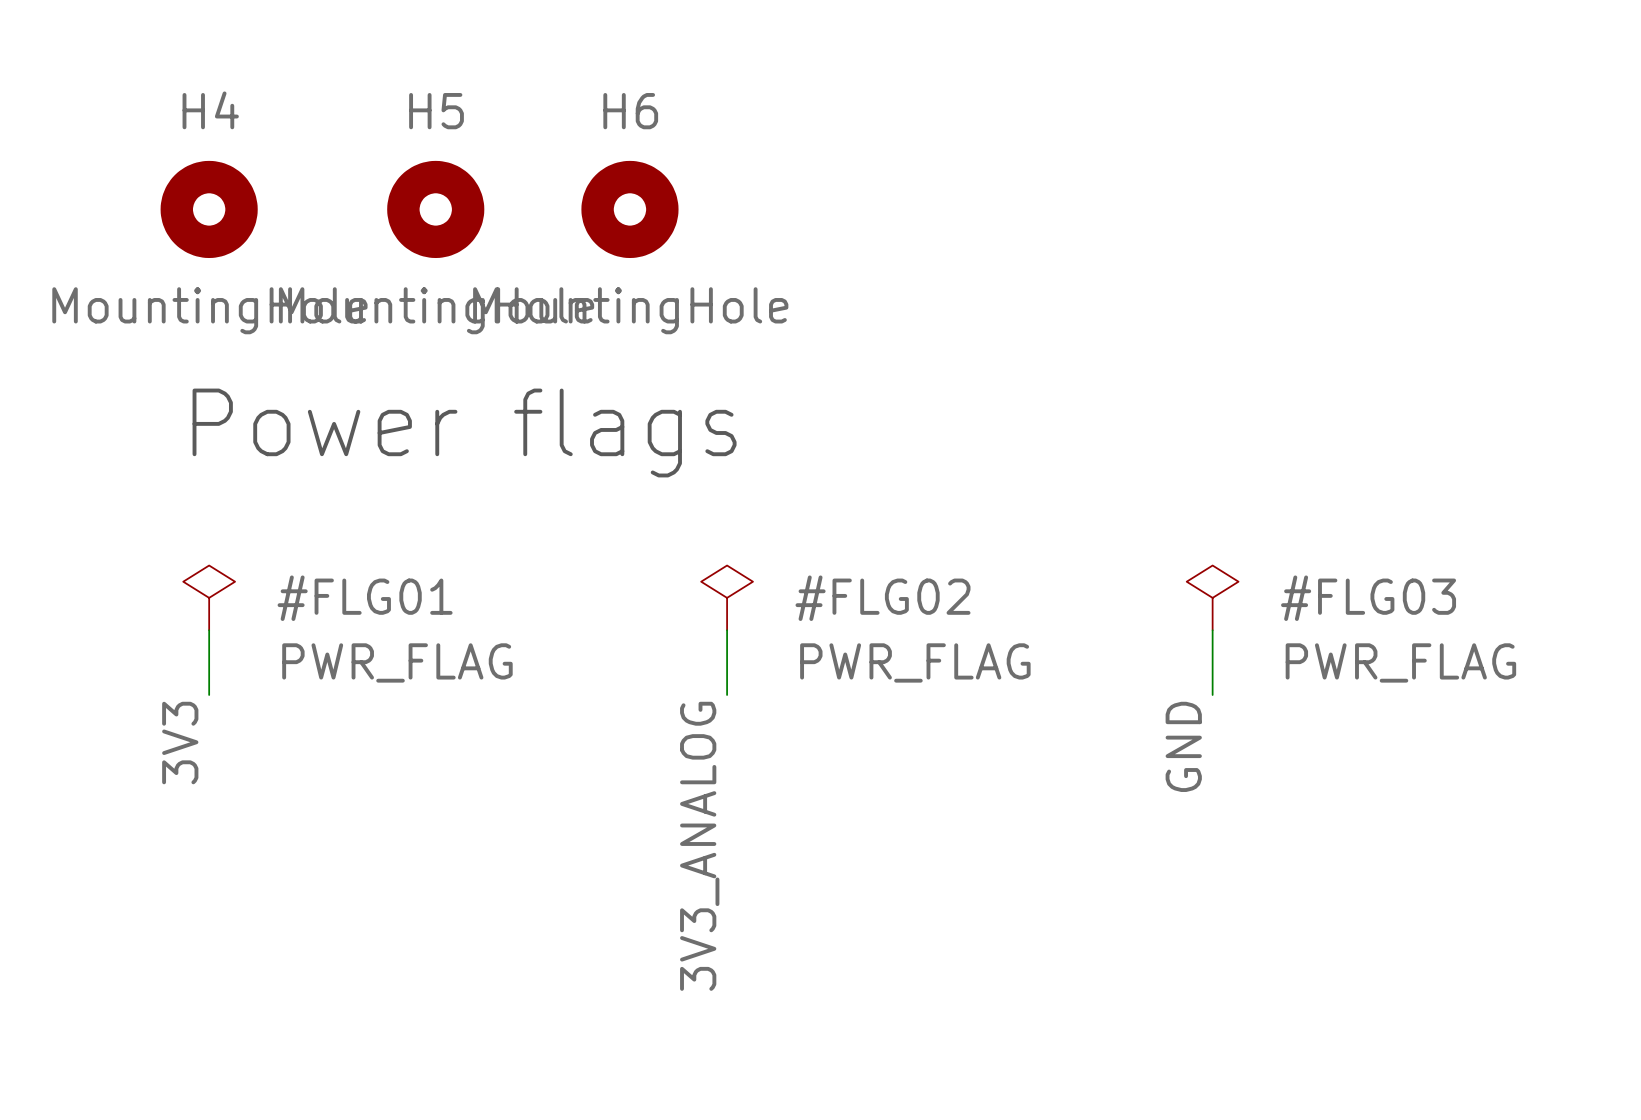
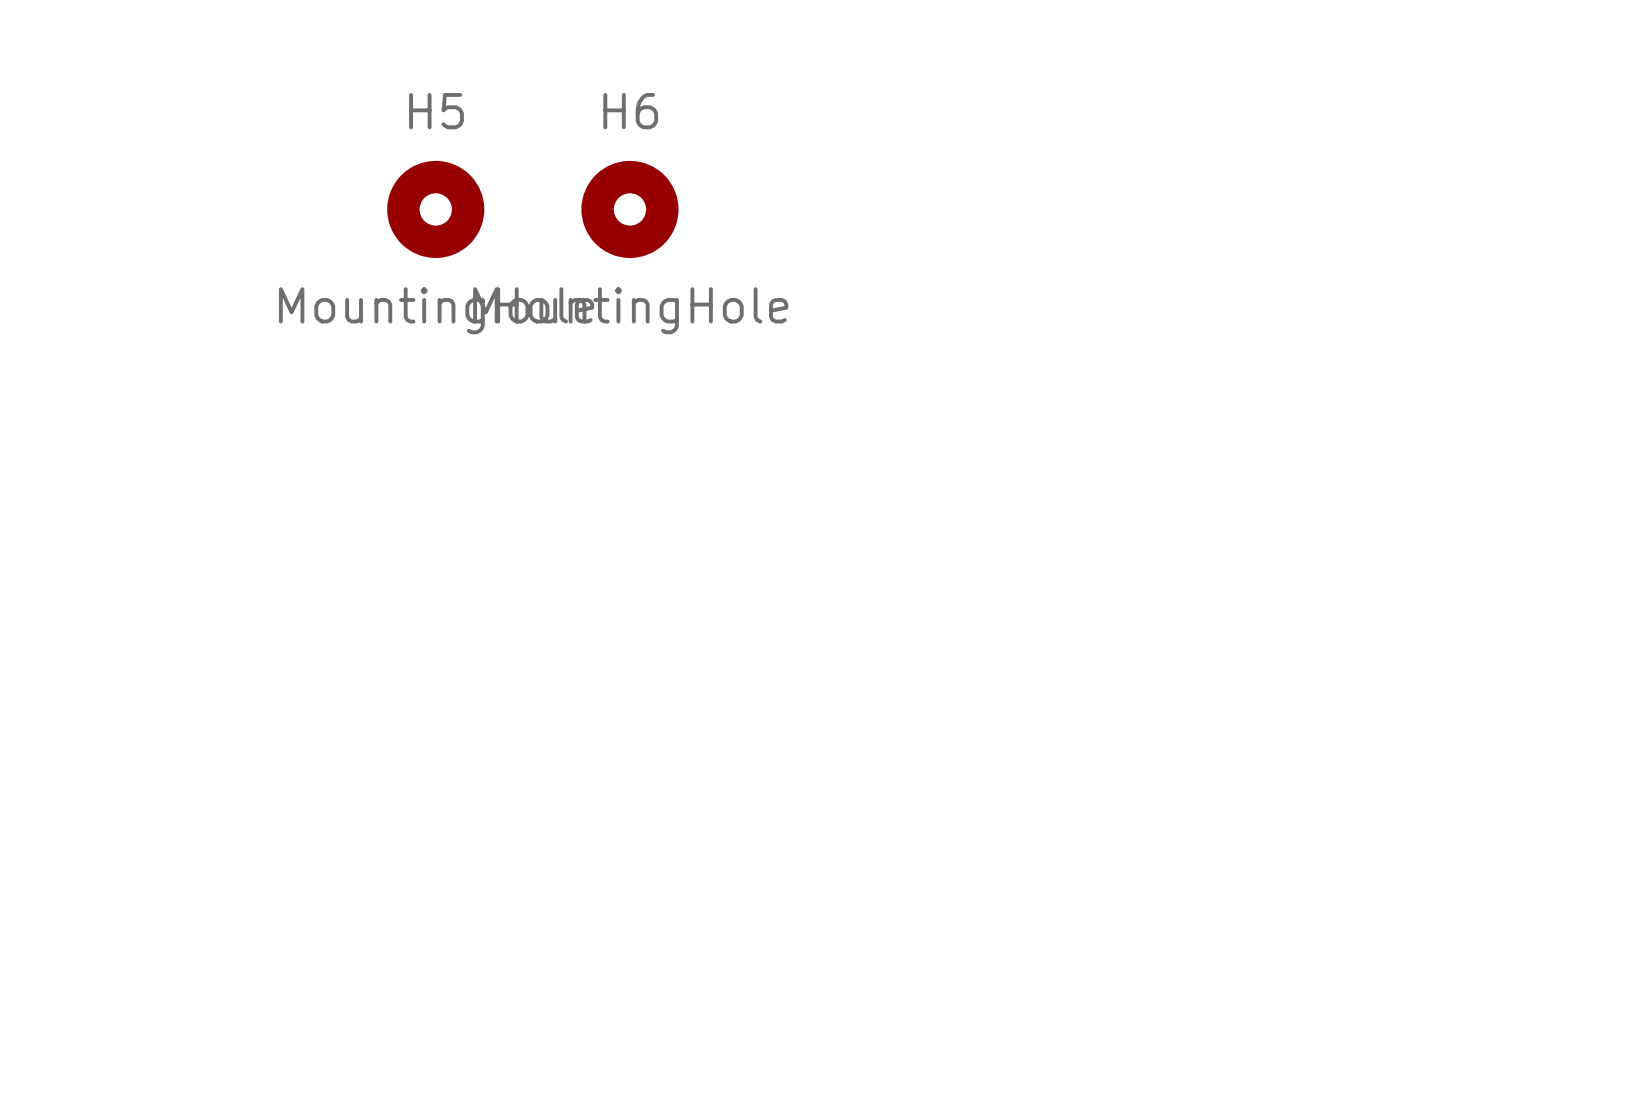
H4: MountingHole (209, 209) -> none
text: Power flags (464, 433) -> none
#FLG01: PWR_FLAG (209, 597) -> none
#FLG02: PWR_FLAG (727, 597) -> none
#FLG03: PWR_FLAG (1212, 597) -> none
wire: (209, 630) (209, 695) -> none
wire: (727, 630) (727, 695) -> none
wire: (1212, 630) (1212, 695) -> none
label: 3V3 (180, 743) -> none
label: GND (1183, 746) -> none
label: 3V3_ANALOG (699, 846) -> none

